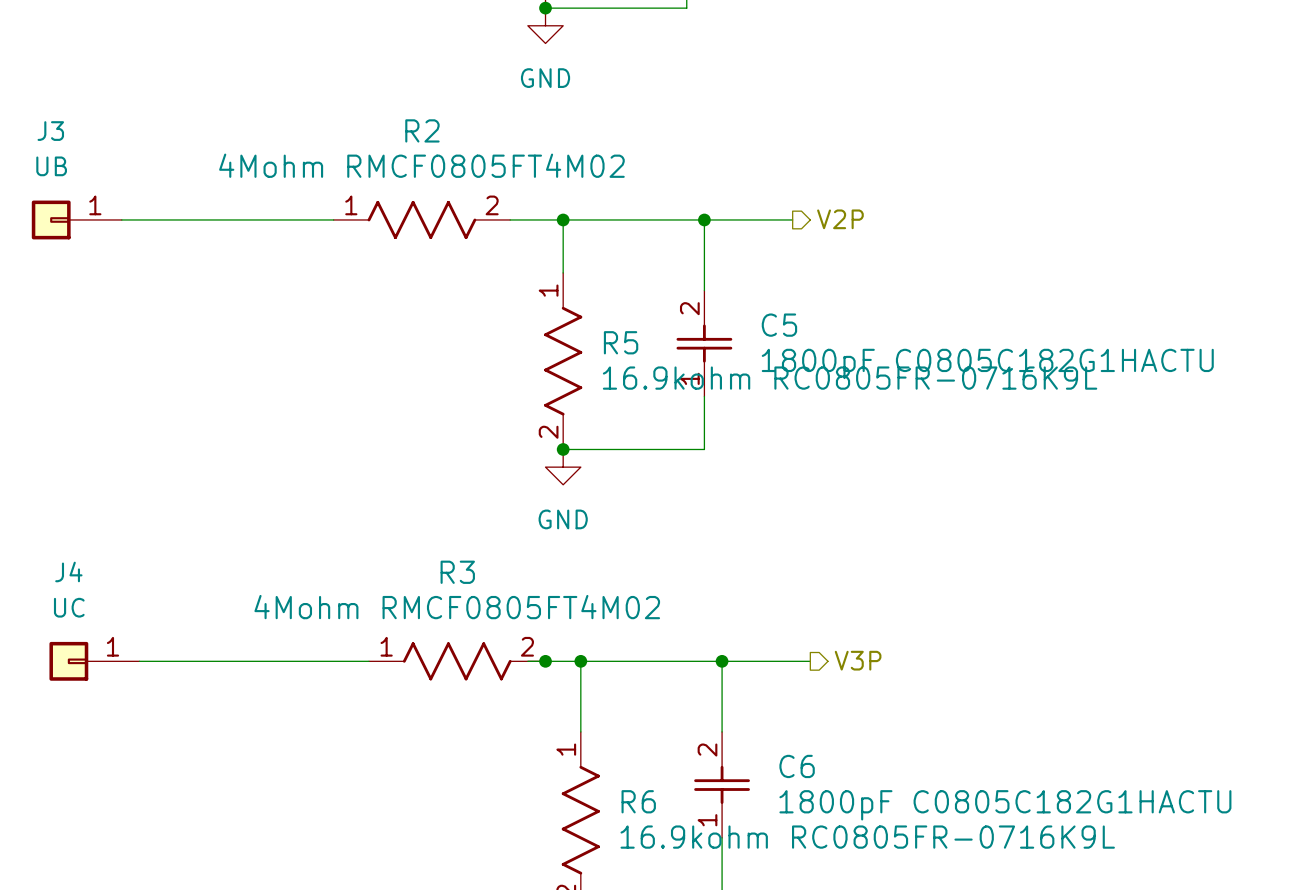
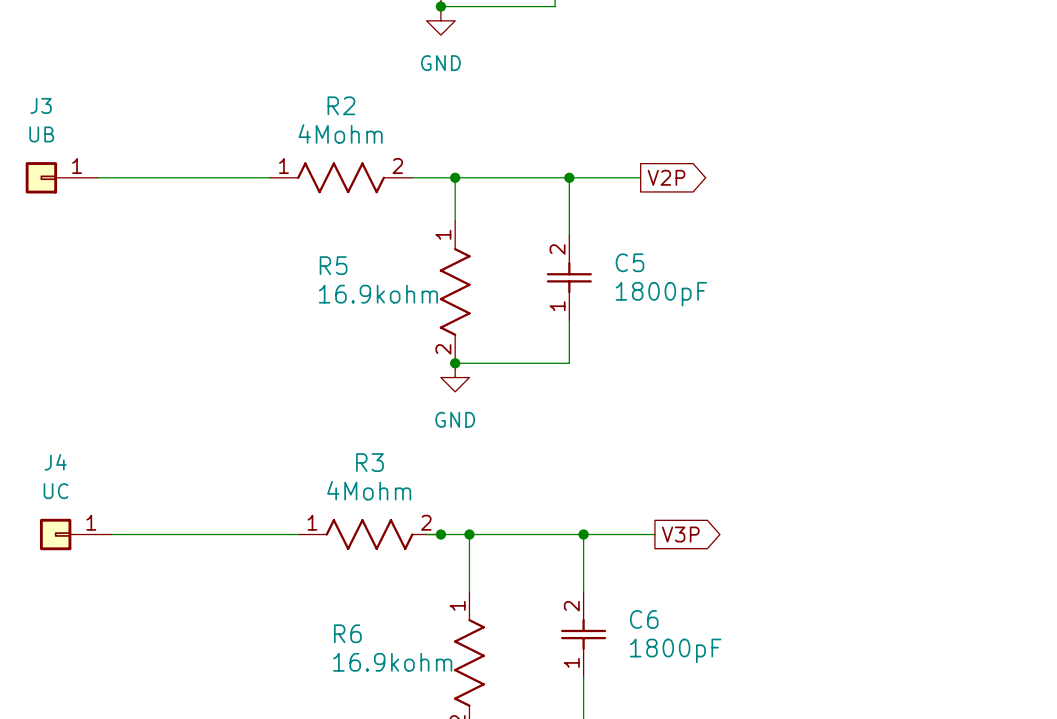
R2 value: 4Mohm RMCF0805FT4M02 (421, 165) -> 4Mohm (340, 133)
global label: none -> V2P (666, 177)
hierarchical label: V2P (840, 219) -> none
R5 name position: R5 (621, 342) -> R5 (333, 265)
C5 value: 1800pF C0805C182G1HACTU (987, 363) -> 1800pF (661, 294)
R5 value: 16.9kohm RC0805FR-0716K9L (850, 378) -> 16.9kohm (378, 294)
R3 value: 4Mohm RMCF0805FT4M02 (457, 607) -> 4Mohm (369, 490)
hierarchical label: V3P (858, 660) -> none
global label: none -> V3P (680, 534)
R6 name position: R6 (638, 801) -> R6 (347, 633)
C6 value: 1800pF C0805C182G1HACTU (1005, 805) -> 1800pF (675, 650)
R6 value: 16.9kohm RC0805FR-0716K9L (867, 837) -> 16.9kohm (392, 662)

